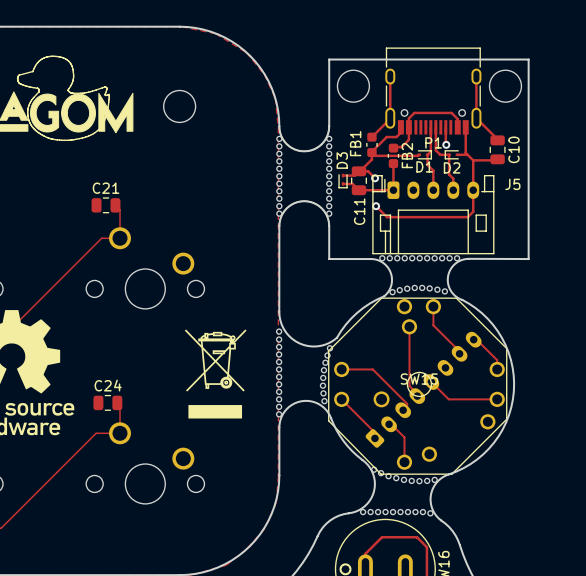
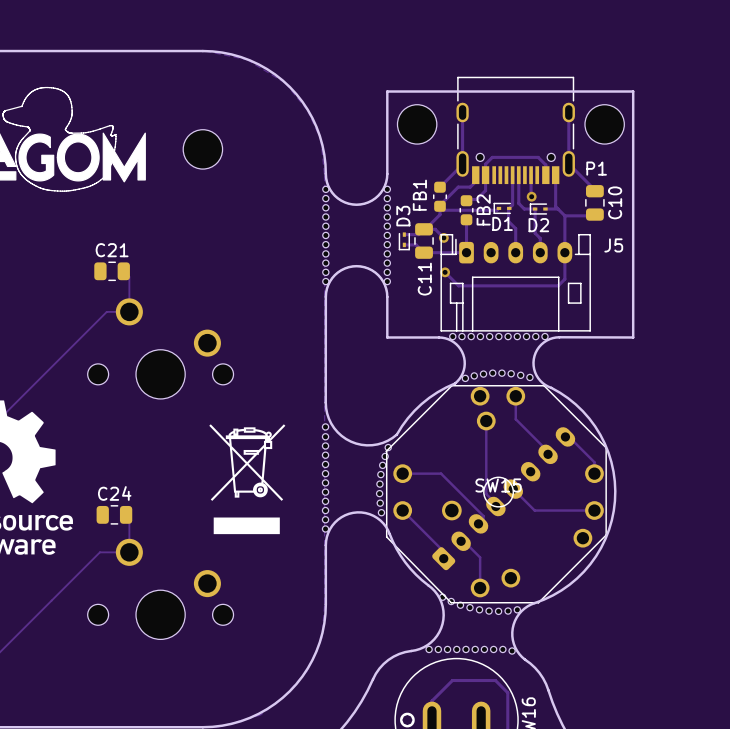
P1 name position: P1 (433, 142) -> P1 (596, 168)
D1 rotation: 0° (424, 154) -> 180° (502, 208)

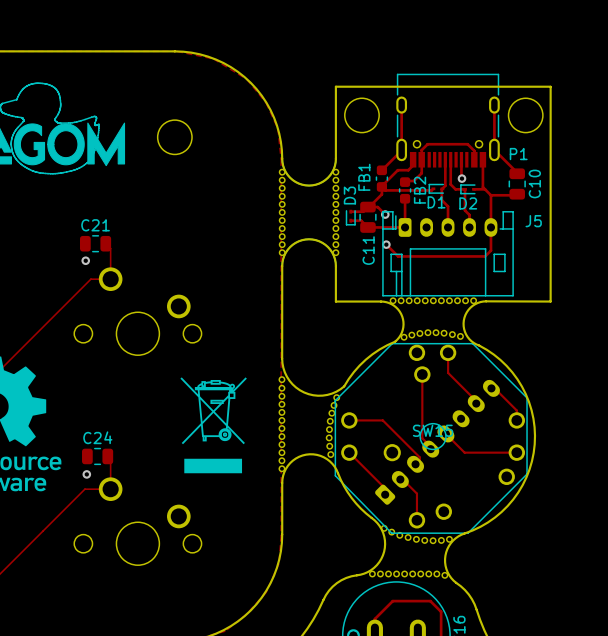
via: none -> (85, 260)
via: none -> (86, 474)

